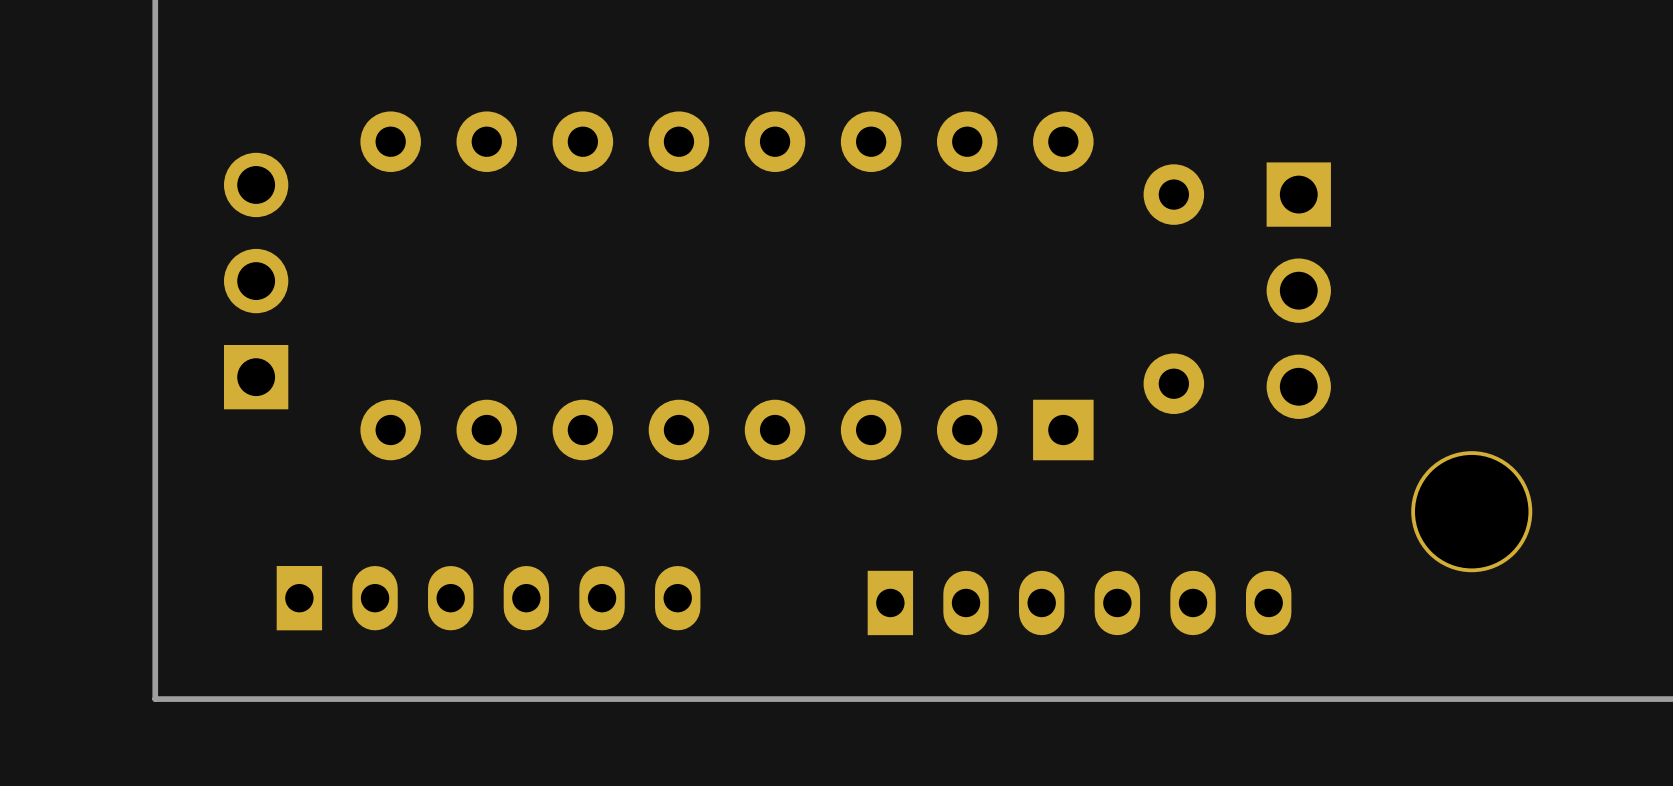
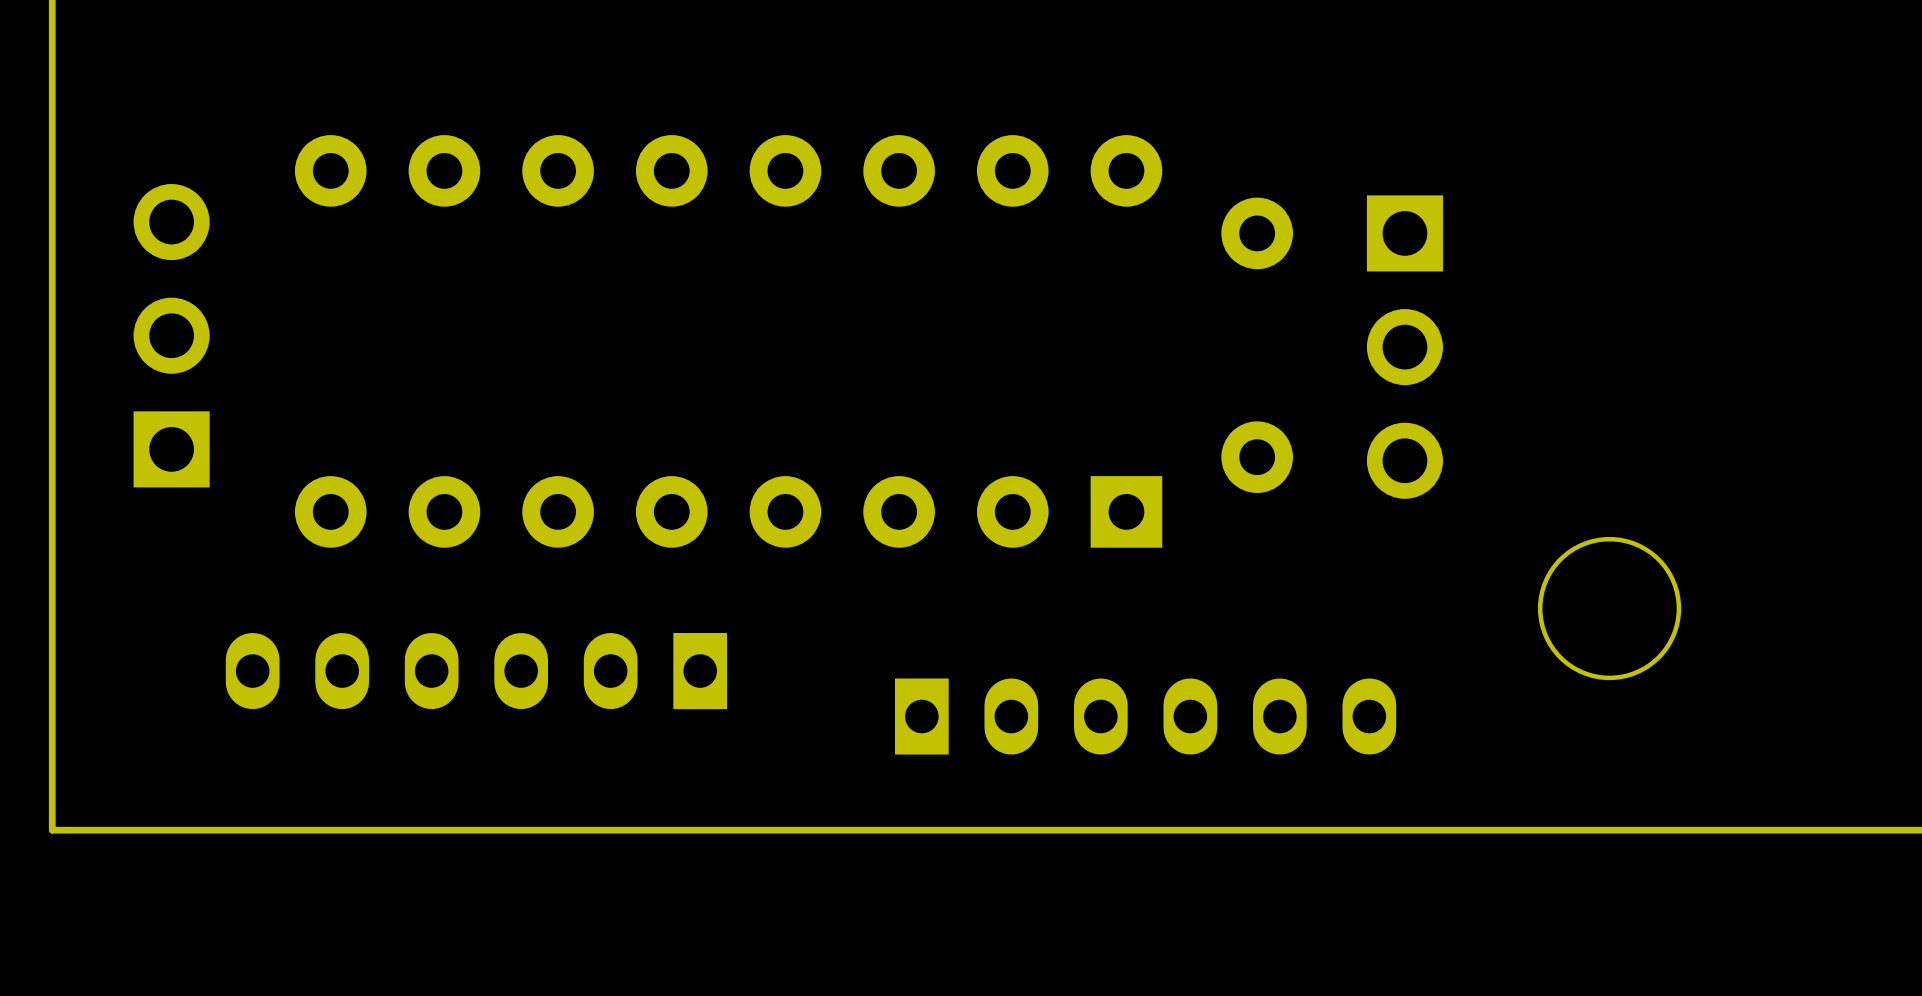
part rotation: 0° (488, 598) -> 180° (476, 671)

